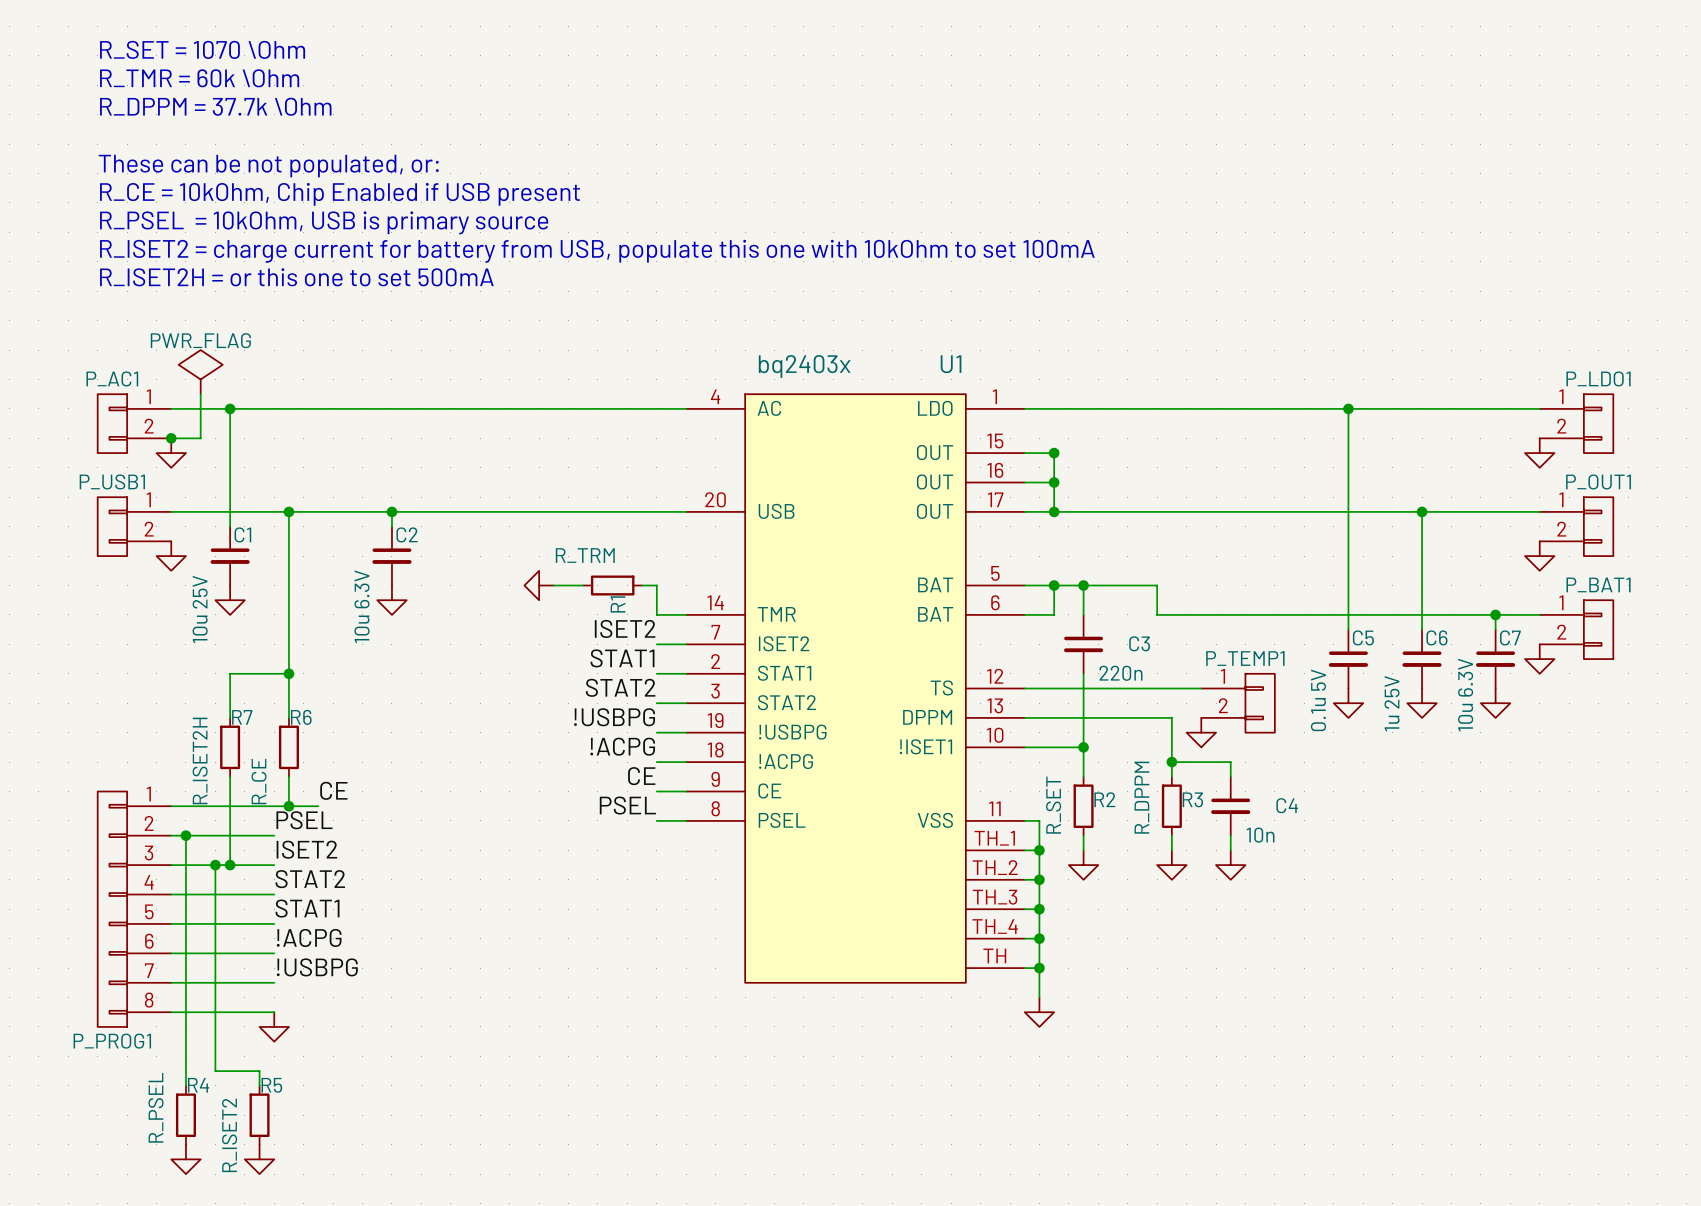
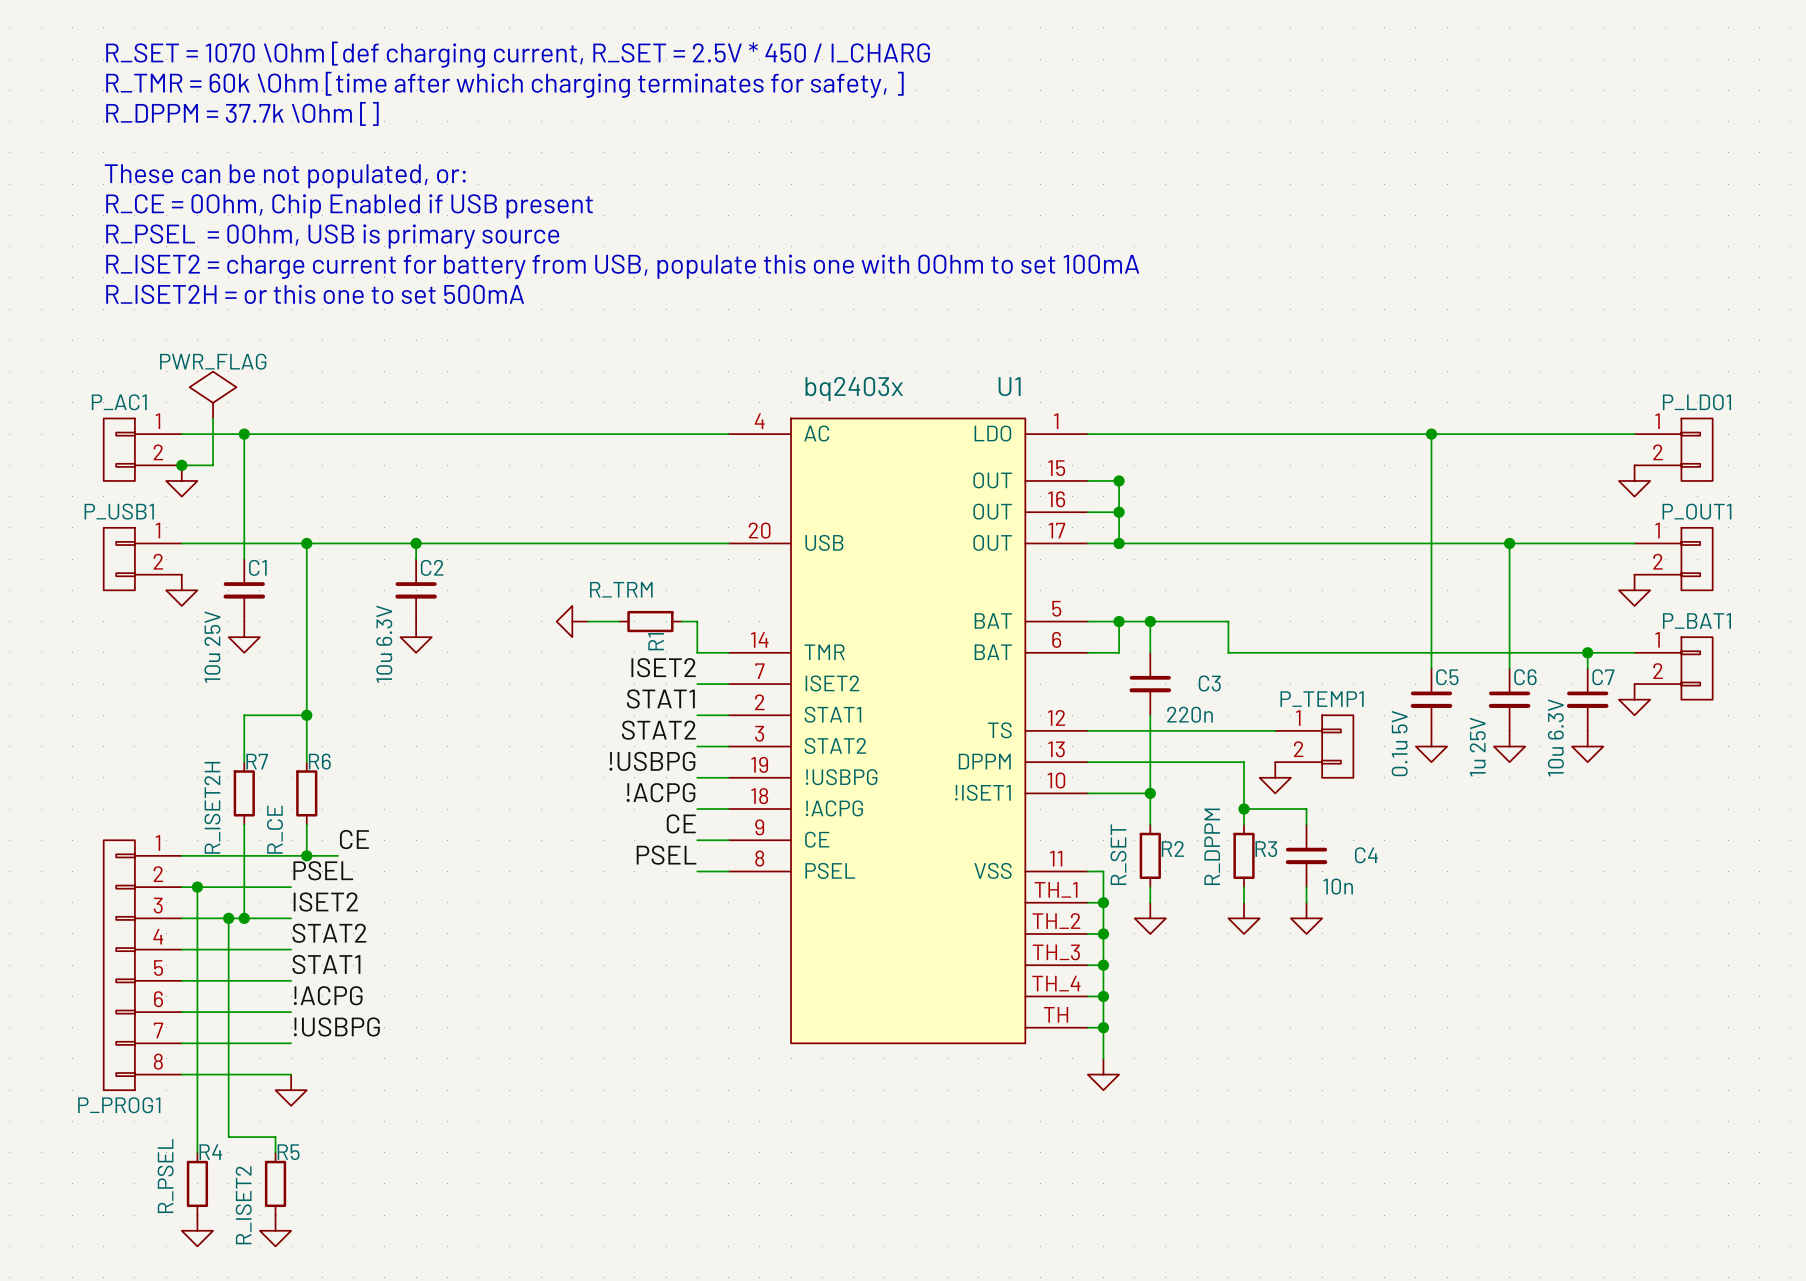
text: R_SET = 1070 \Ohm (202, 49) -> R_SET = 1070 \Ohm [def charging current, R_SET = 2.5V * 450 / I_CHARG (518, 54)
text: R_TMR = 60k \Ohm (199, 78) -> R_TMR = 60k \Ohm [time after which charging terminates for safety, ] (504, 84)
text: R_DPPM = 37.7k \Ohm (215, 106) -> R_DPPM = 37.7k \Ohm [] (242, 113)
text: R_CE = 10kOhm, Chip Enabled if USB present (339, 194) -> R_CE = 0Ohm, Chip Enabled if USB present (349, 206)
text: R_PSEL = 10kOhm, USB is primary source (324, 222) -> R_PSEL = 0Ohm, USB is primary source (332, 236)
text: R_ISET2 = charge current for battery from USB, populate this one with 10kOhm to set 100mA (597, 251) -> R_ISET2 = charge current for battery from USB, populate this one with 0Ohm to set 100mA (622, 266)

